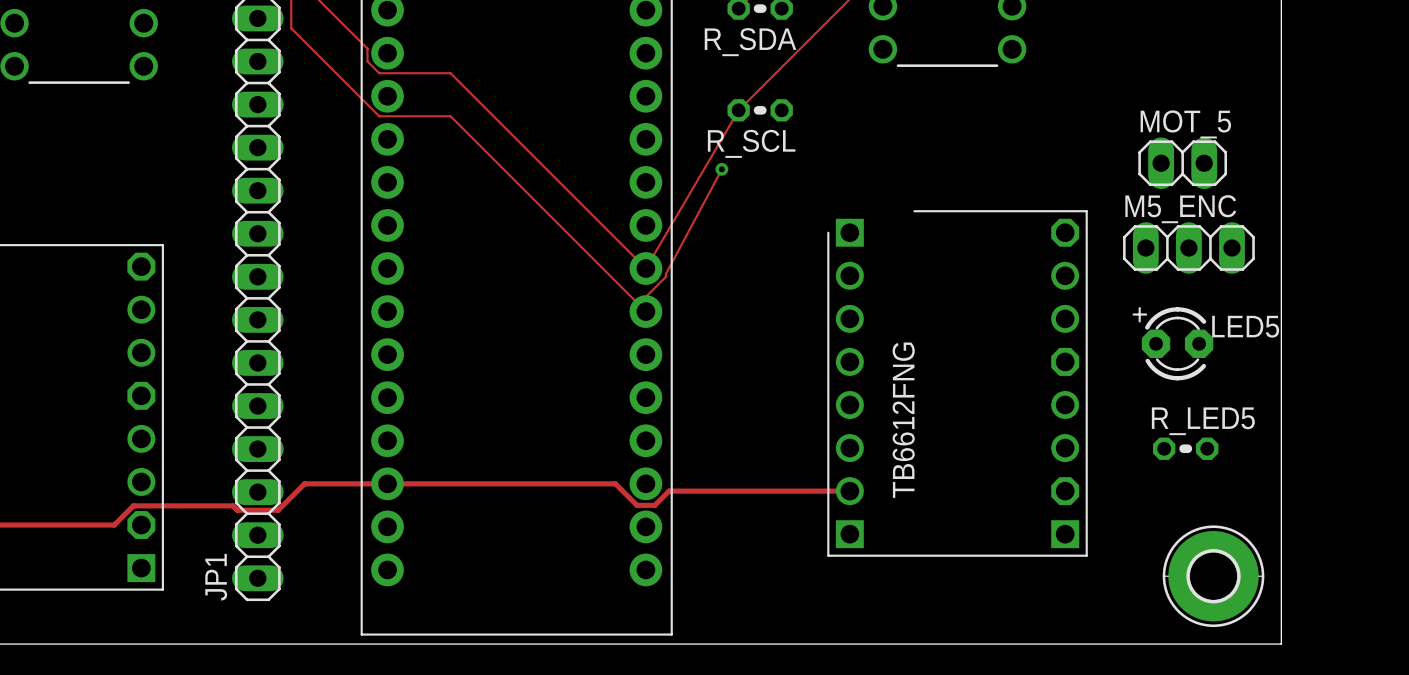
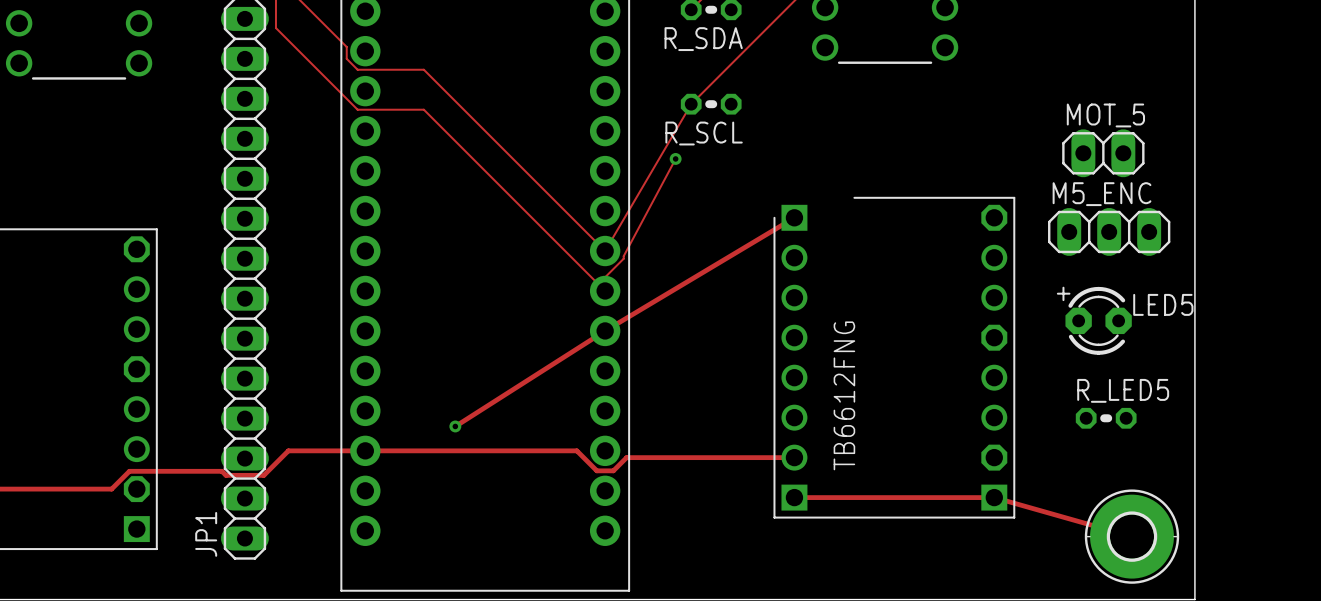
track: none -> (794, 217) (605, 330) (455, 426)
via: none -> (455, 426)
track: none -> (794, 497) (994, 497) (1131, 536)

